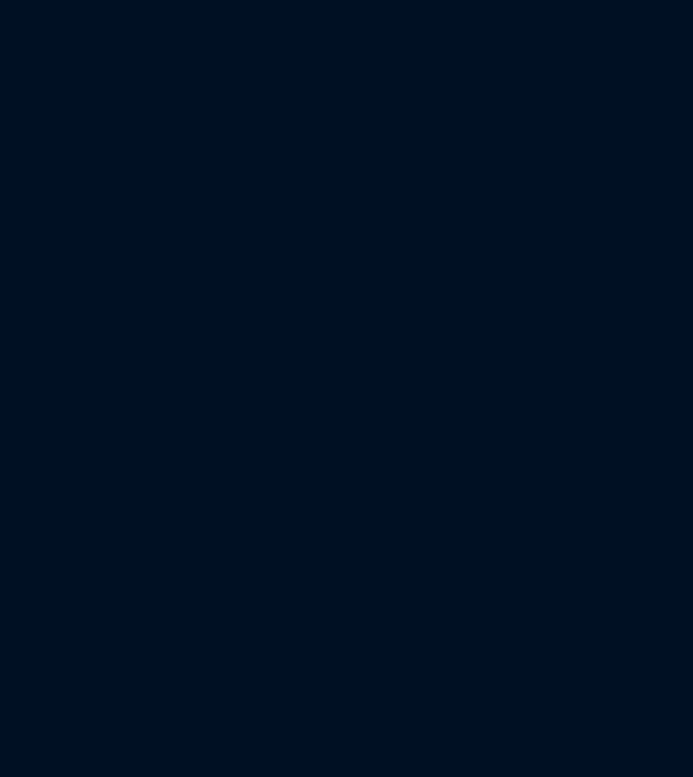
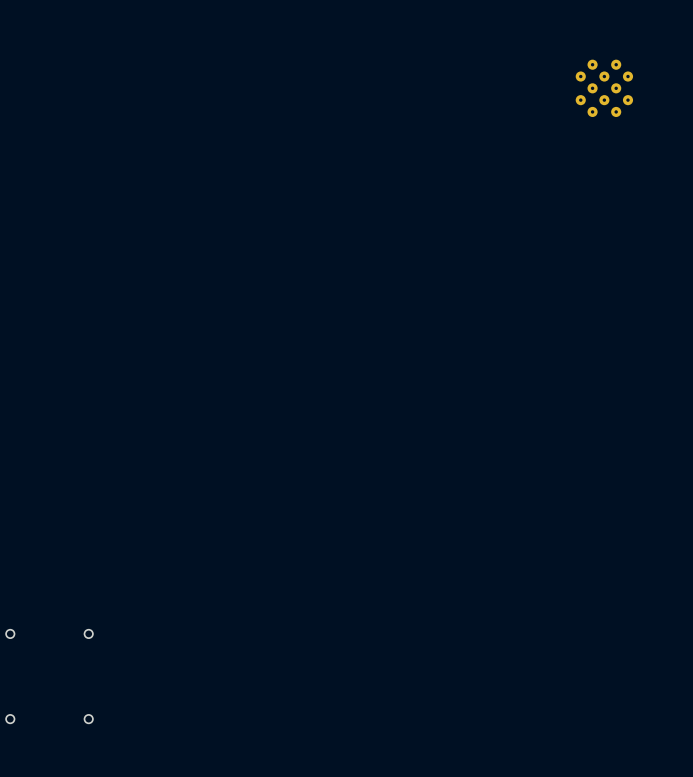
part: none -> (604, 88)
part: none -> (10, 633)
part: none -> (88, 633)
part: none -> (10, 719)
part: none -> (88, 719)

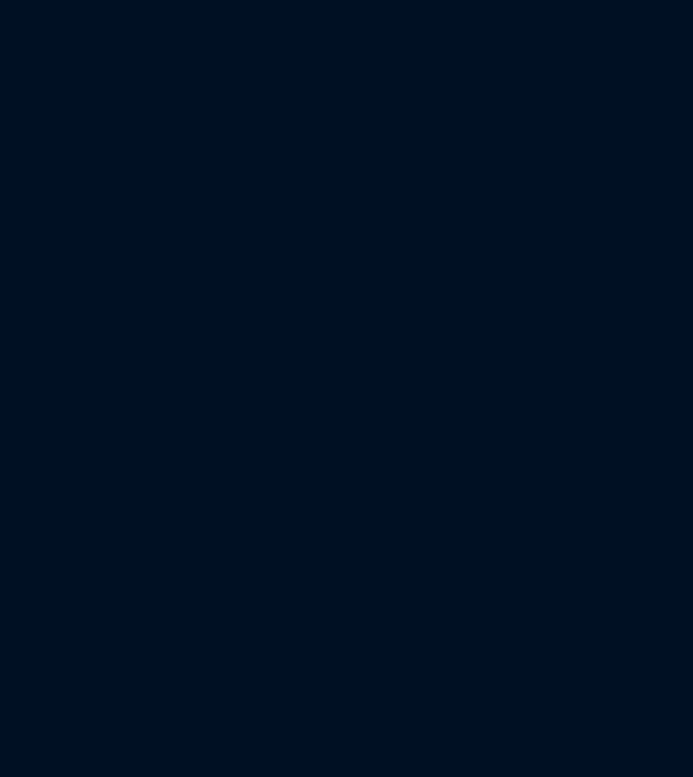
part: (604, 88) -> none
part: (10, 633) -> none
part: (88, 633) -> none
part: (10, 719) -> none
part: (88, 719) -> none

